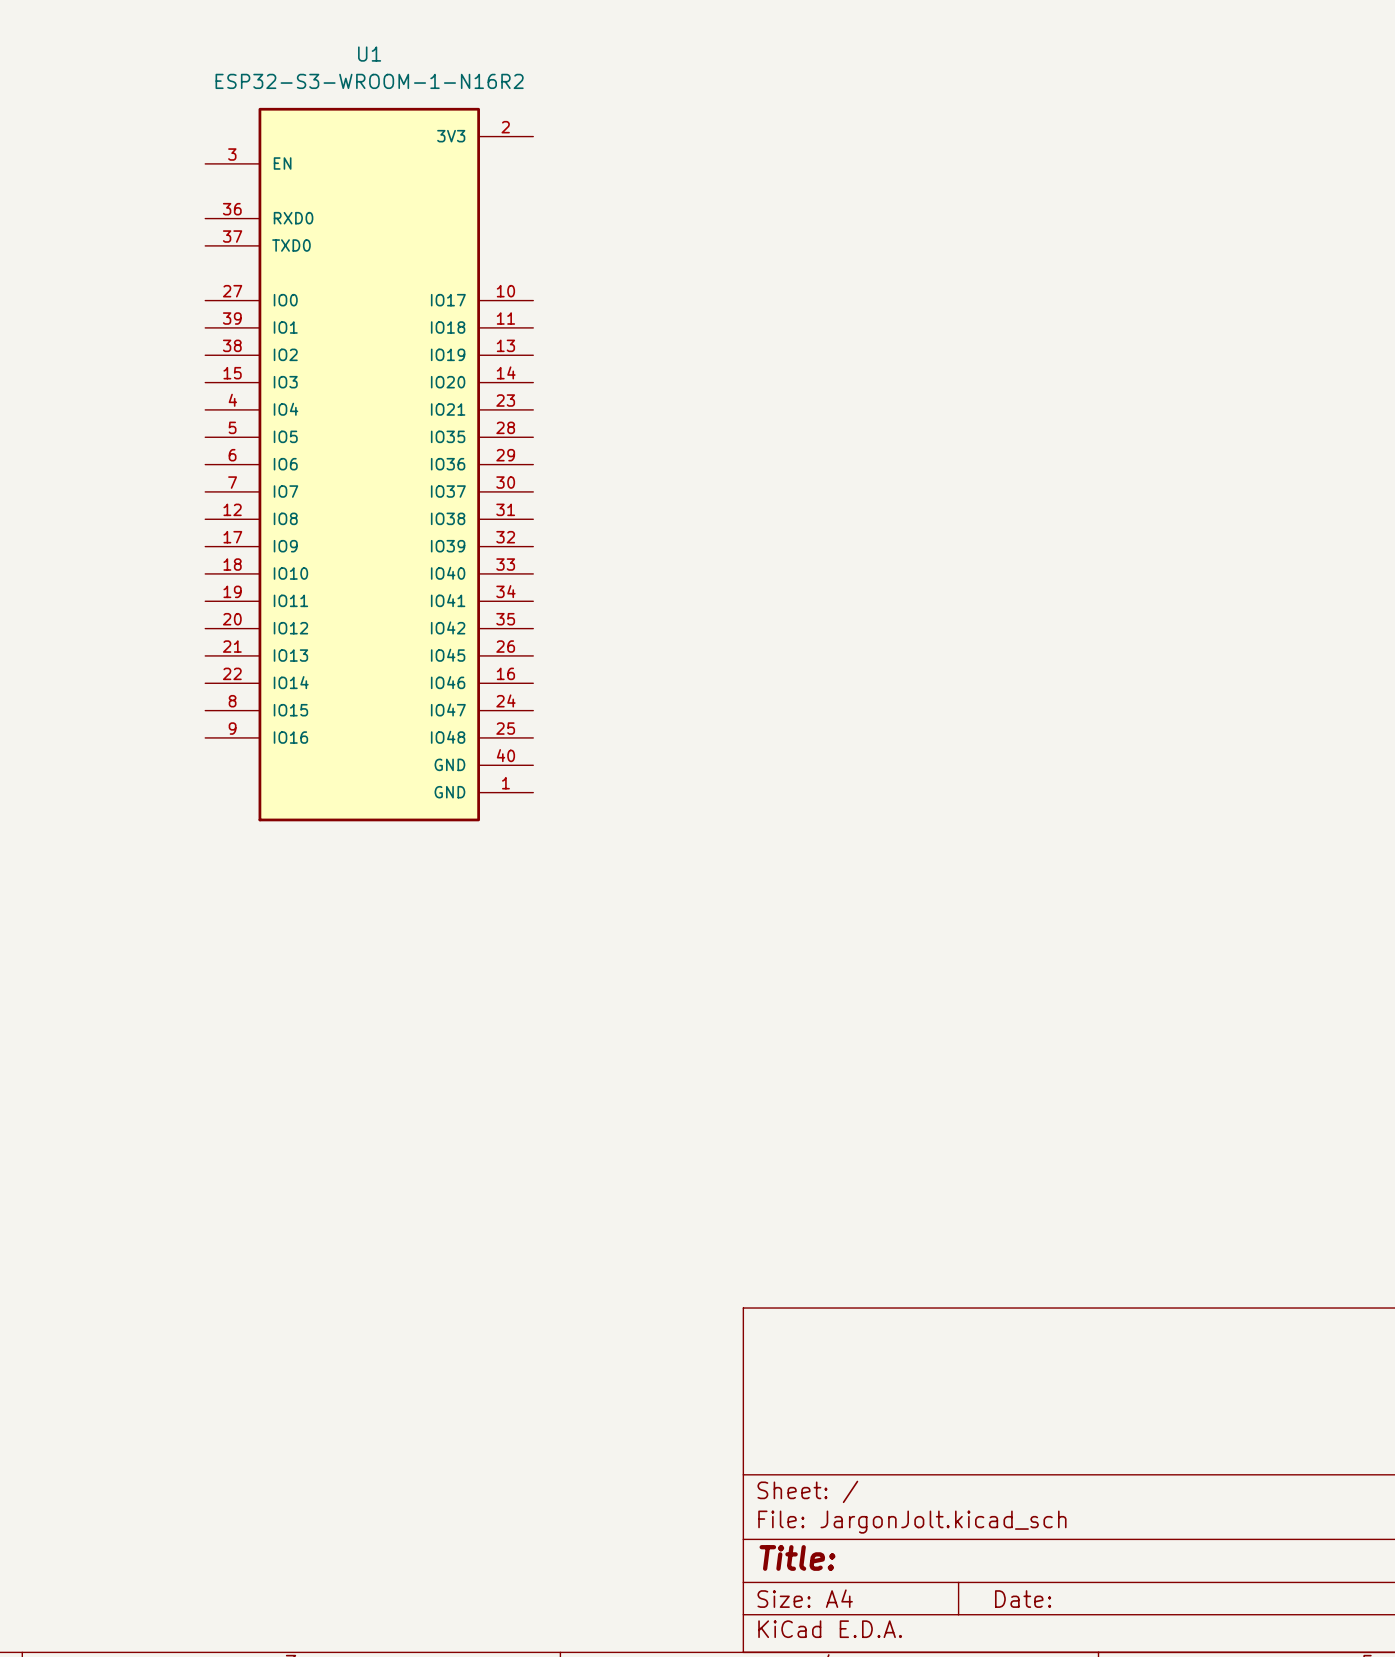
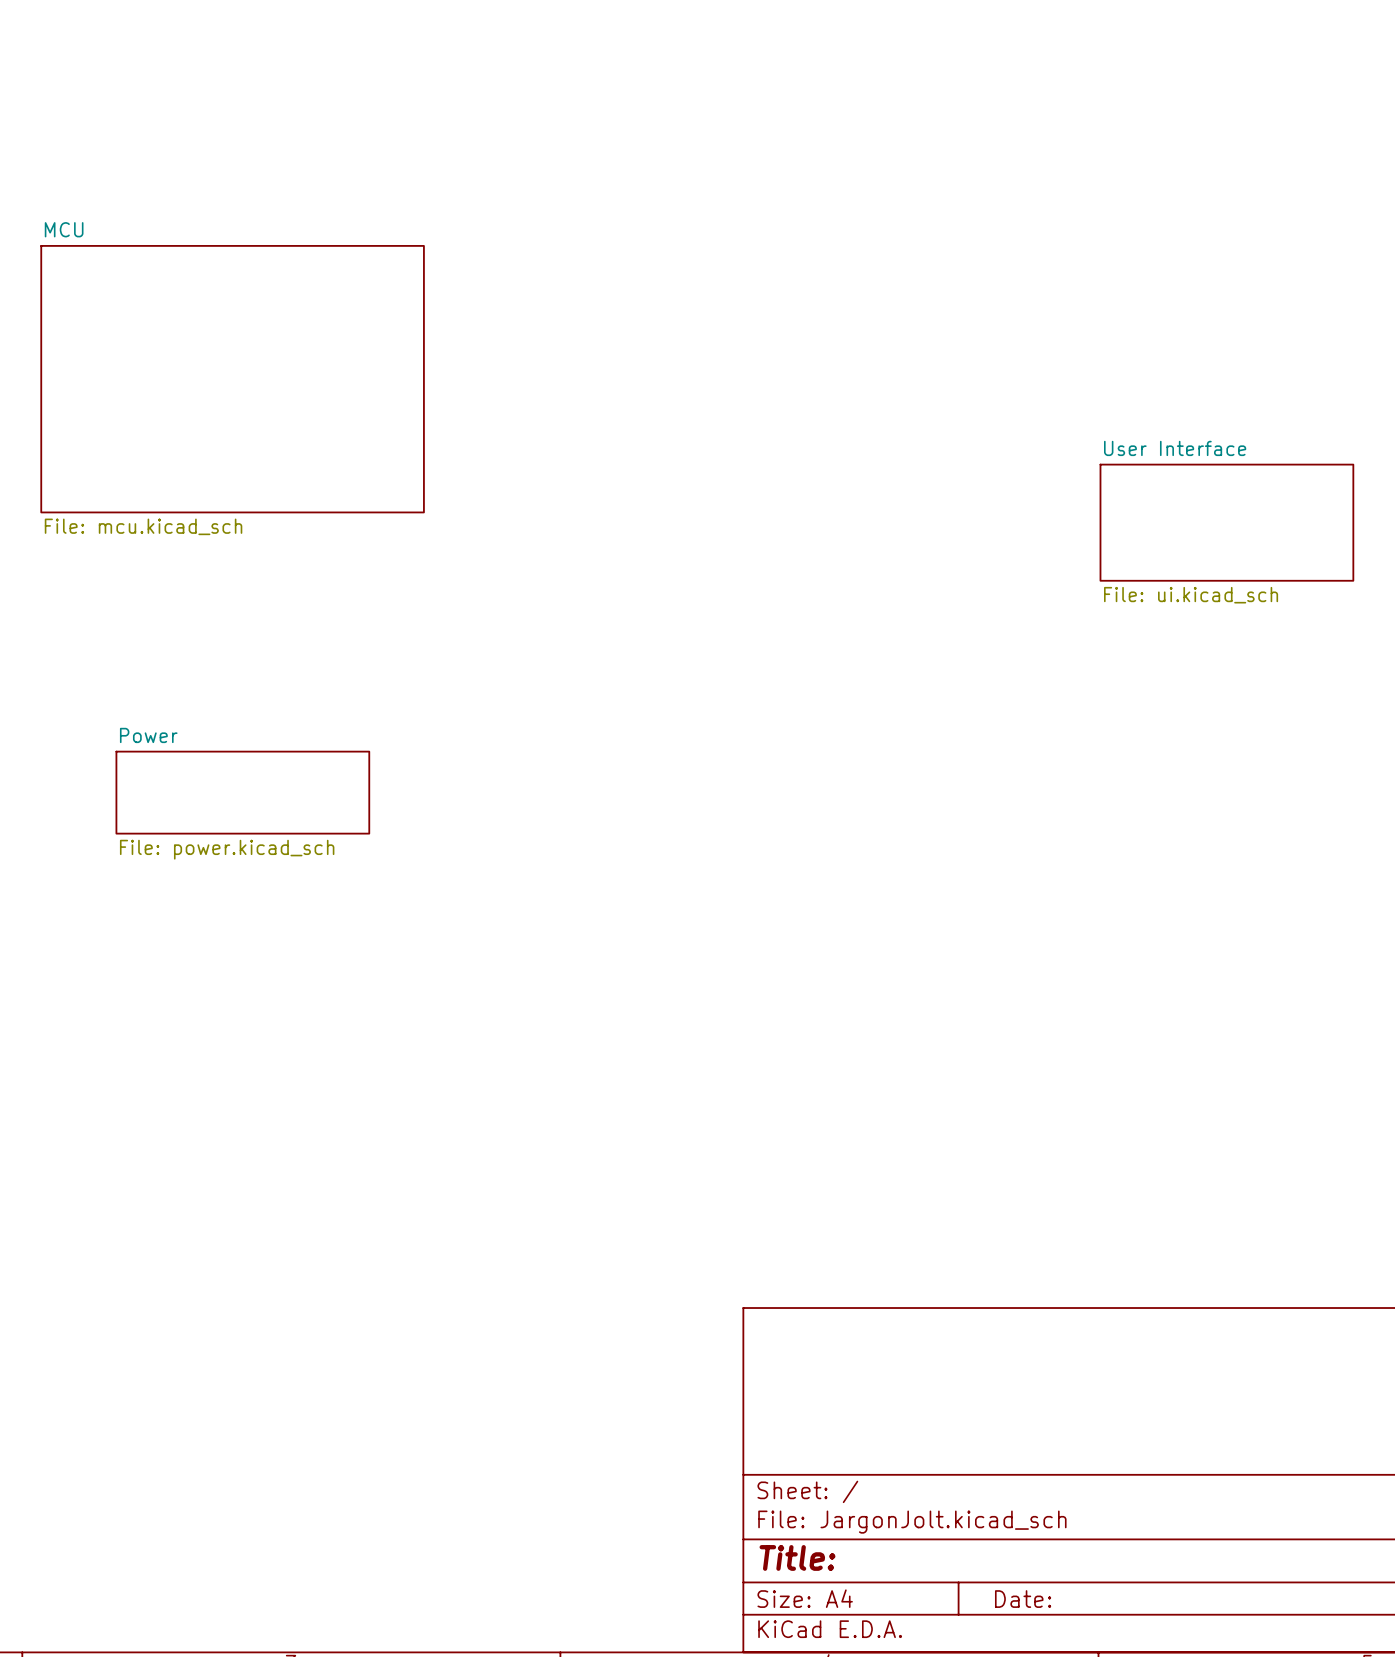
sheet MCU: none -> File: mcu.kicad_sch (232, 379)
U1: ESP32-S3-WROOM-1-N16R2 (369, 464) -> none
sheet User Interface: none -> File: ui.kicad_sch (1226, 522)
sheet Power: none -> File: power.kicad_sch (242, 792)

